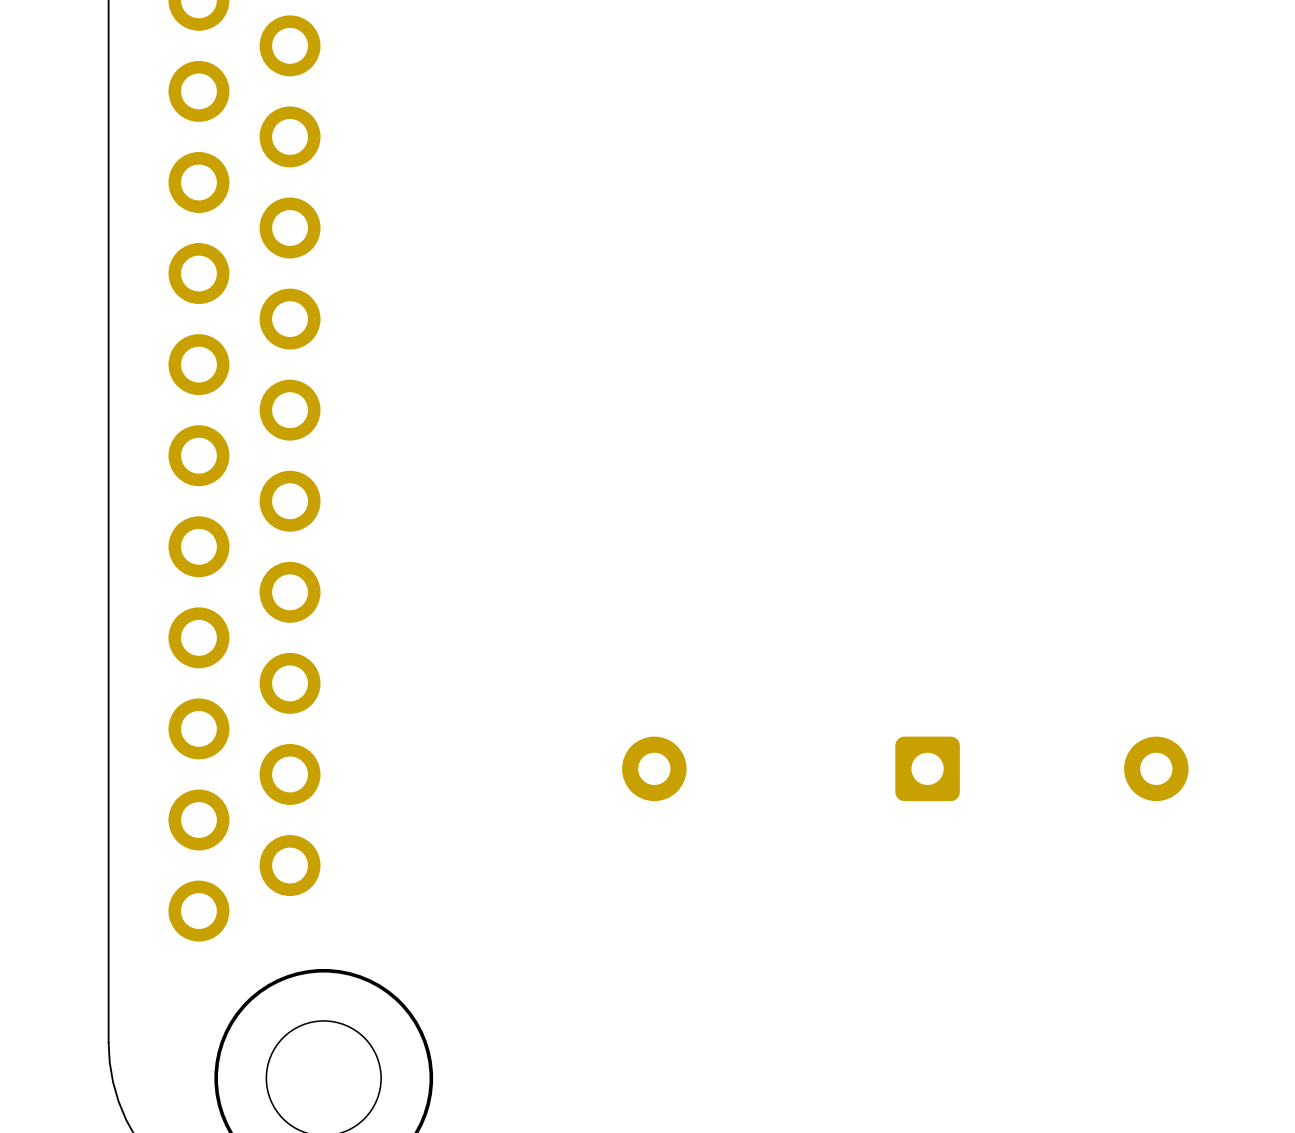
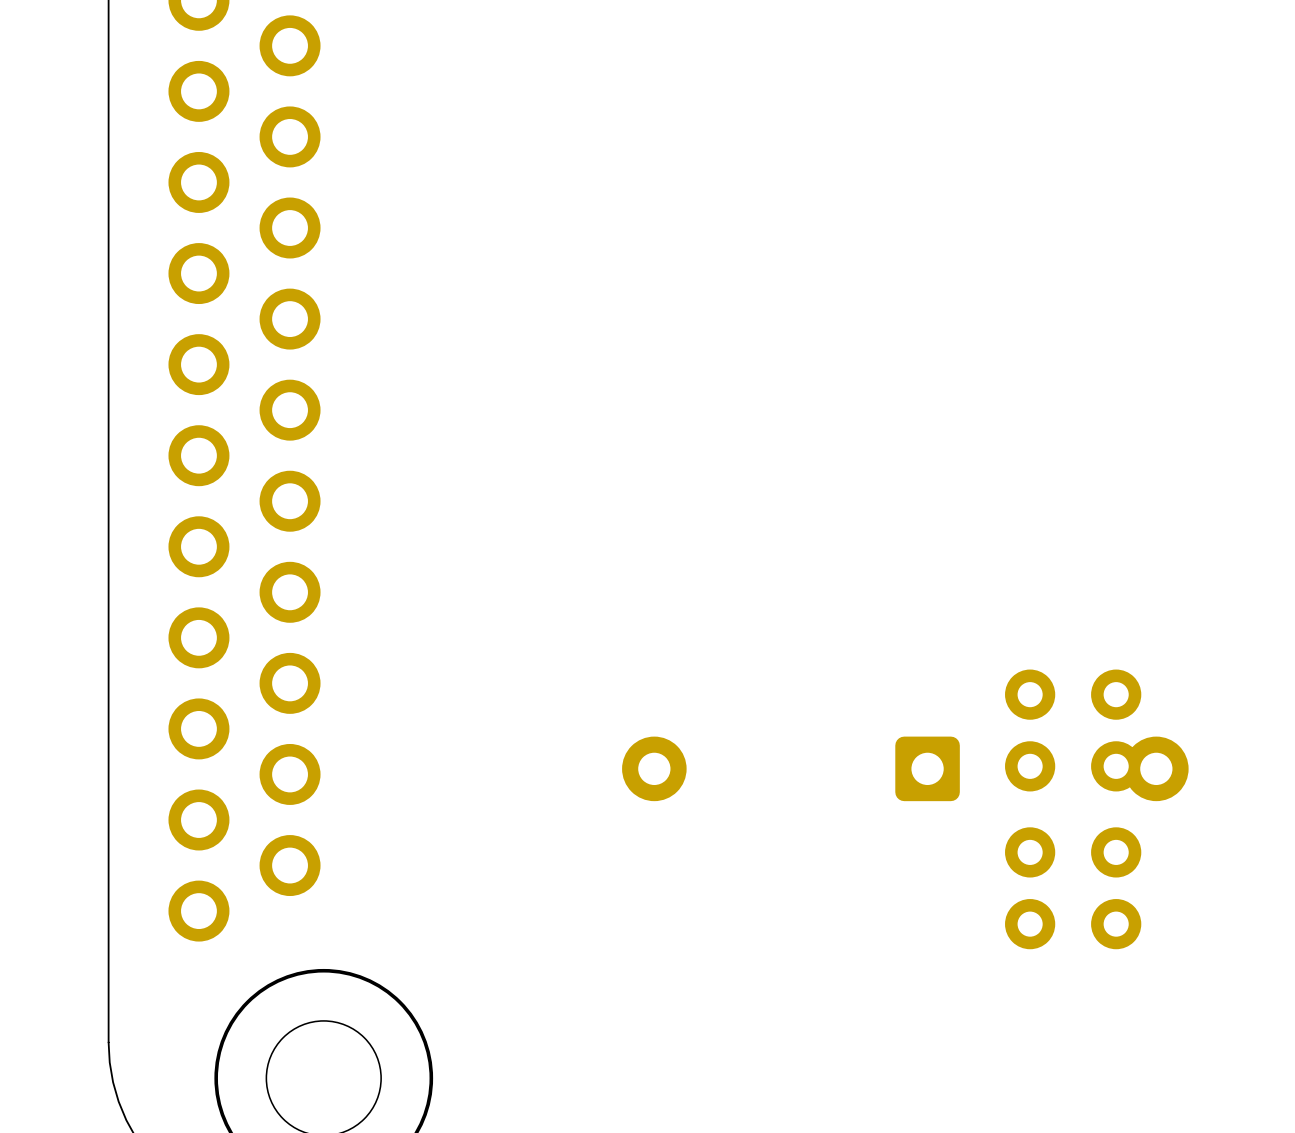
part: none -> (1030, 730)
part: none -> (1116, 730)
part: none -> (1030, 888)
part: none -> (1116, 888)

